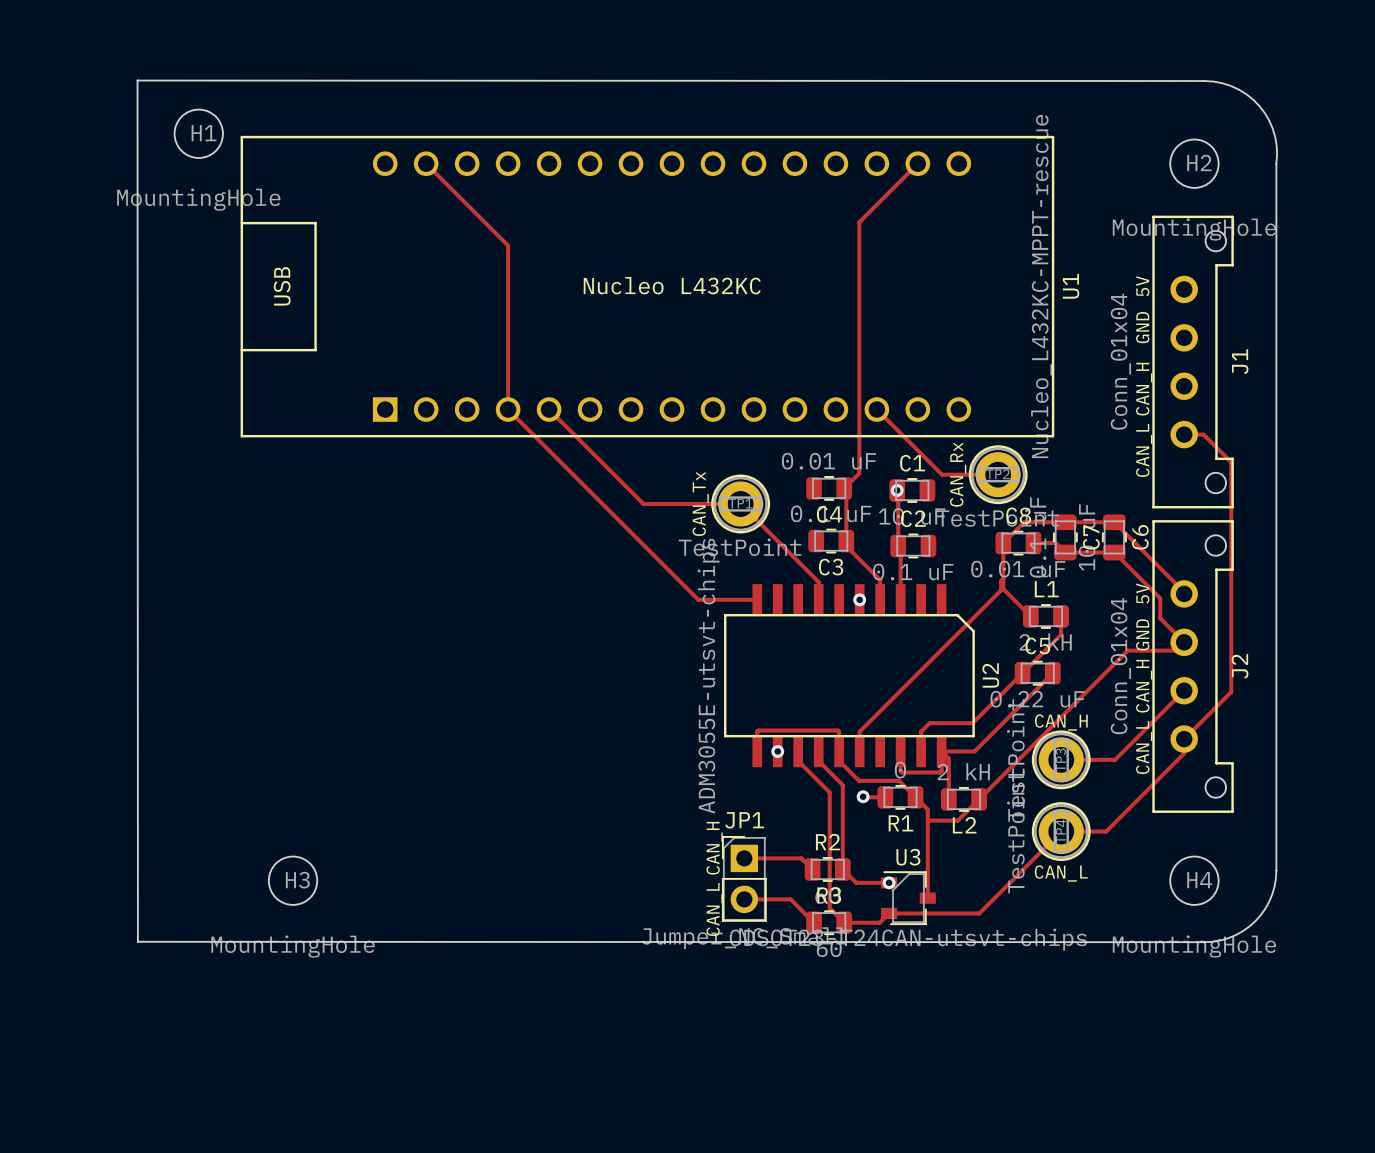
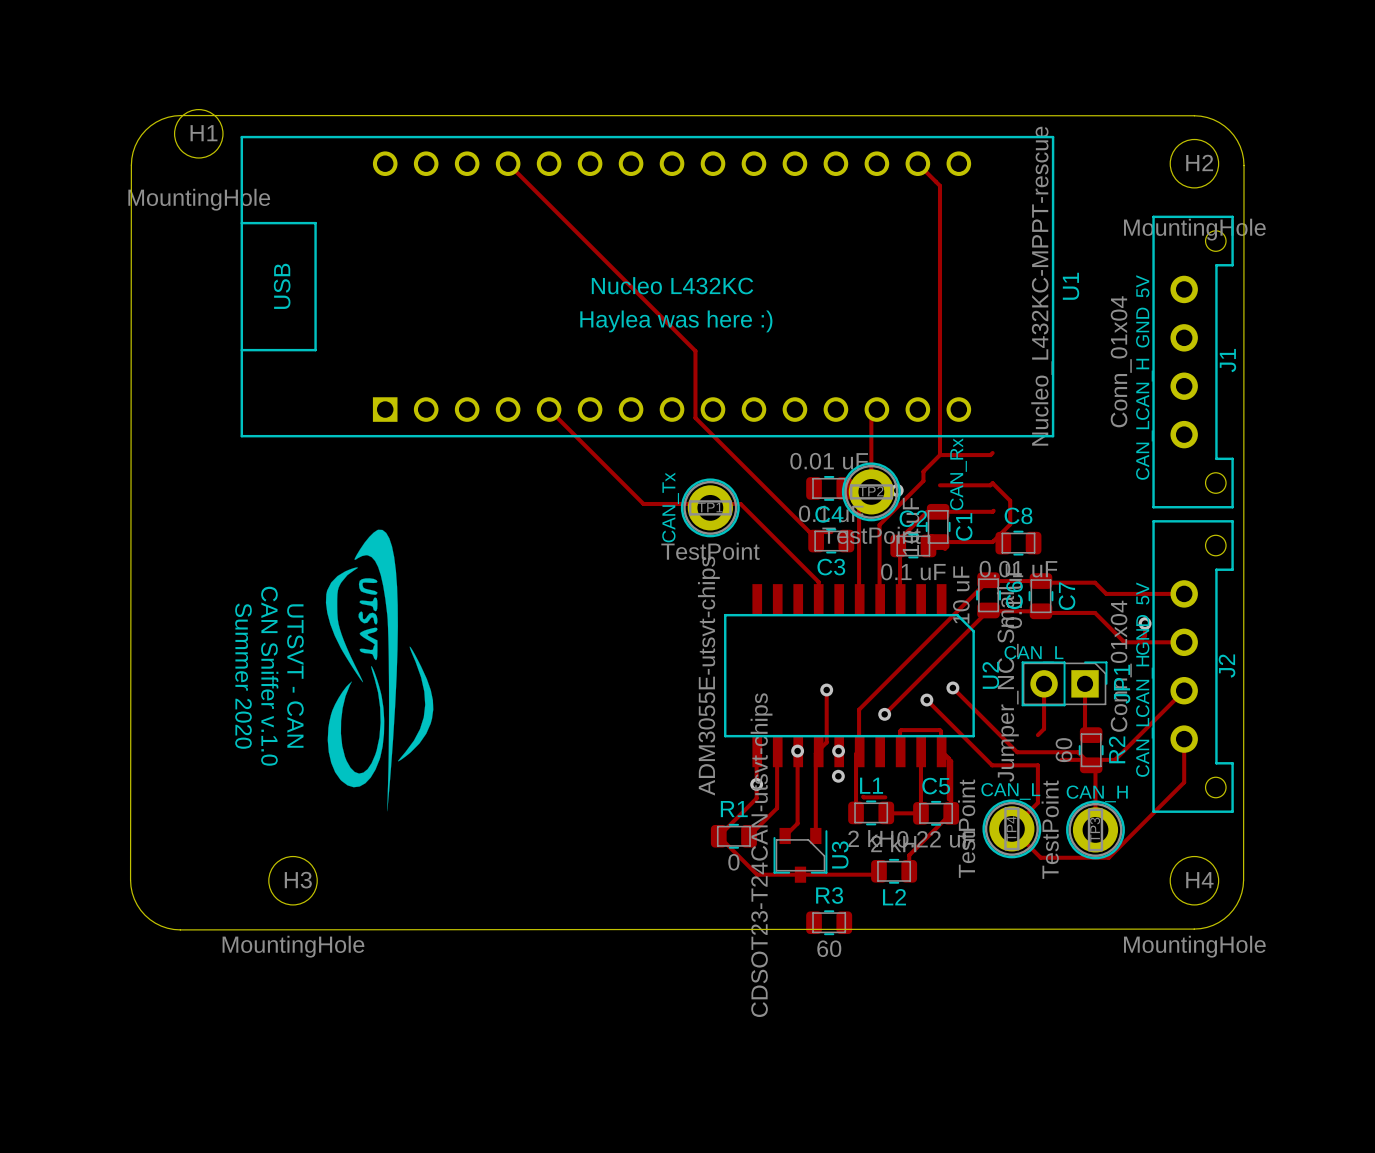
board edge: (137, 80) (137, 941) (1204, 942) (1220, 940) (1235, 935) (1249, 926) (1260, 915) (1272, 894) (1276, 870) (1277, 154) (1275, 137) (1269, 120) (1259, 106) (1246, 94) (1222, 83) (1204, 81) (137, 80) -> (180, 115) (161, 119) (145, 130) (135, 146) (131, 165) (130, 880) (134, 899) (140, 910) (150, 919) (161, 926) (180, 929) (1194, 929) (1213, 925) (1224, 919) (1233, 909) (1241, 892) (1243, 880) (1244, 165) (1240, 146) (1233, 135) (1224, 126) (1207, 117) (1194, 115) (180, 115)
track: (426, 163) (508, 245) (508, 409) (698, 599) (757, 599) -> none
track: none -> (508, 163) (695, 351) (695, 417) (809, 532) (831, 532)
track: (917, 163) (859, 222) (859, 473) (844, 488) (846, 490) (846, 546) (880, 580) (880, 599) -> (917, 163) (939, 185) (939, 455)
text: none -> Haylea was here :) (676, 321)
J1 name position: J1 (1240, 361) -> J1 (1227, 360)
track: (876, 409) (942, 474) (998, 474) -> (876, 409) (871, 415) (871, 491) (859, 504) (859, 599)
track: (1184, 434) (1203, 434) (1231, 462) (1231, 692) (1184, 739) -> none
track: none -> (992, 452) (990, 455) (939, 455)
track: none -> (939, 455) (923, 471) (923, 480) (879, 524) (879, 599)
TP2 position: (998, 474) -> (871, 491)
track: none -> (939, 485) (990, 485) (992, 483) (1010, 500) (1010, 524) (992, 542) (938, 542) (945, 549)
track: (897, 490) (898, 545) (900, 548) (900, 599) -> none
C1 rotation: 0° (912, 490) -> 90° clockwise (938, 526)
C1 position: (912, 490) -> (938, 526)
text position: CAN_Tx (700, 503) -> CAN_Tx (670, 507)
TP1 position: (740, 503) -> (710, 507)
track: none -> (993, 510) (927, 511) (900, 539) (900, 599)
drawing: none -> [325, 529, 434, 812]
C7 position: (1065, 537) -> (1040, 596)
C6 position: (1114, 537) -> (988, 595)
track: (1033, 543) (1055, 543) (1065, 552) (1114, 552) (1160, 598) (1160, 618) (1184, 642) (1175, 650) (1127, 650) (957, 820) (927, 820) -> none
track: (1003, 578) (1001, 581) (1001, 590) (859, 731) (859, 751) -> none
track: (1184, 593) (1114, 522) (1024, 522) (1003, 543) (1003, 589) (1030, 616) -> (1184, 593) (1106, 593) (1095, 582) (988, 580) (859, 709) (859, 751) (856, 754) (856, 812)
via: (859, 599) -> none
L1 position: (1045, 616) -> (871, 812)
track: (1061, 616) (1061, 634) (972, 723) (929, 723) (921, 731) (921, 751) -> none
track: none -> (1145, 623) (1145, 635) (1138, 642)
via: none -> (1145, 623)
track: none -> (1184, 642) (1124, 642) (1095, 612) (988, 610) (884, 714)
text: none -> CAN_L (1033, 654)
J2 name position: J2 (1240, 666) -> J2 (1227, 666)
C5 position: (1037, 673) -> (936, 813)
track: (1052, 673) (974, 751) (941, 751) (940, 772) (901, 772) (900, 751) -> none
text: none -> Summer 2020 (243, 676)
text: none -> CAN Sniffer v.1.0 (269, 676)
text: none -> UTSVT - CAN (295, 676)
track: none -> (1044, 683) (1044, 728) (1037, 735)
track: none -> (1085, 683) (1085, 728) (1091, 735)
track: none -> (952, 687) (1017, 752) (1078, 752) (1095, 769) (1095, 829)
via: none -> (952, 687)
track: none -> (826, 690) (826, 742) (815, 753) (815, 835)
via: none -> (826, 690)
via: none -> (926, 700)
via: none -> (884, 714)
text position: CAN_H (1061, 722) -> CAN_H (1097, 793)
track: none -> (756, 751) (756, 798) (718, 836) (757, 874) (875, 874) (878, 871)
track: (757, 751) (758, 730) (837, 730) (839, 761) (859, 780) (899, 780) (927, 809) (927, 898) -> none
track: none -> (777, 751) (777, 808) (749, 836)
via: (777, 751) -> none
track: none -> (797, 751) (797, 823) (785, 835)
via: none -> (797, 751)
track: (798, 751) (798, 761) (829, 792) (829, 908) (844, 922) (879, 922) (889, 913) (979, 913) (1061, 831) (1106, 831) (1184, 753) -> (926, 700) (992, 765) (1037, 765) (1037, 802) (1011, 828) (1040, 857) (1108, 857) (1184, 782) (1184, 753)
track: (818, 751) (818, 761) (842, 785) (842, 869) (856, 882) (889, 882) -> none
via: none -> (838, 751)
track: none -> (900, 751) (901, 730) (939, 730) (941, 751) (951, 761) (951, 813) (909, 855) (909, 871)
track: none -> (920, 751) (920, 813) (886, 812)
TP3 position: (1061, 759) -> (1095, 829)
R1 value position: 0 (900, 770) -> 0 (733, 862)
via: none -> (838, 776)
via: none -> (756, 784)
via: (863, 796) -> none
R1 position: (900, 797) -> (733, 836)
L2 position: (963, 799) -> (894, 871)
R1 name position: R1 (900, 823) -> R1 (734, 809)
TP4 position: (1061, 831) -> (1011, 828)
text: CAN_H (714, 848) -> none
track: (744, 858) (801, 858) (812, 869) -> none
R2 rotation: 0° (827, 869) -> 90° clockwise (1091, 750)
R2 position: (827, 869) -> (1091, 750)
text position: CAN_L (1061, 873) -> CAN_L (1010, 791)
JP1 rotation: 0° (744, 878) -> 90° clockwise (1064, 683)
JP1 position: (744, 878) -> (1064, 683)
via: (889, 882) -> none
U3 rotation: 0° (908, 898) -> 90° clockwise (800, 855)
U3 position: (908, 898) -> (800, 855)
track: (744, 899) (790, 899) (814, 922) -> none
text: CAN_L (714, 909) -> none

